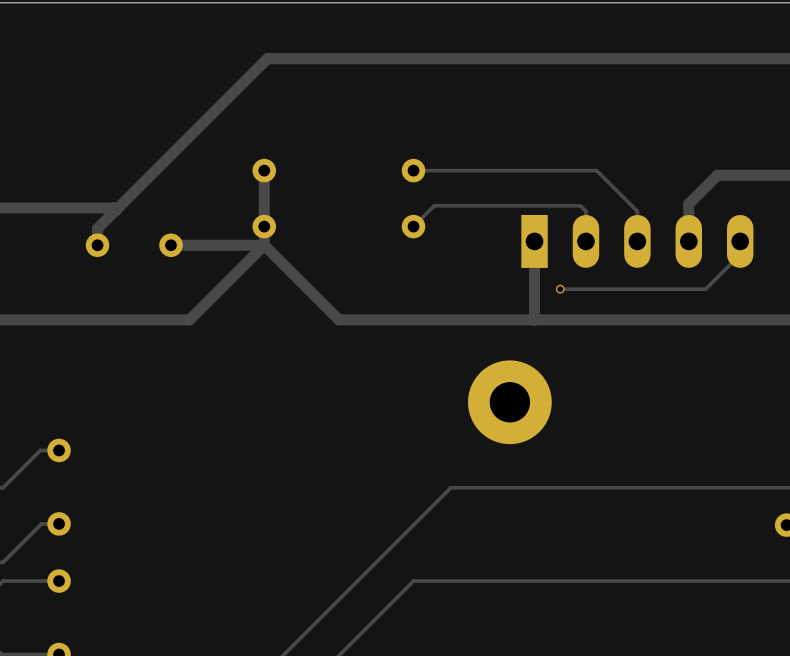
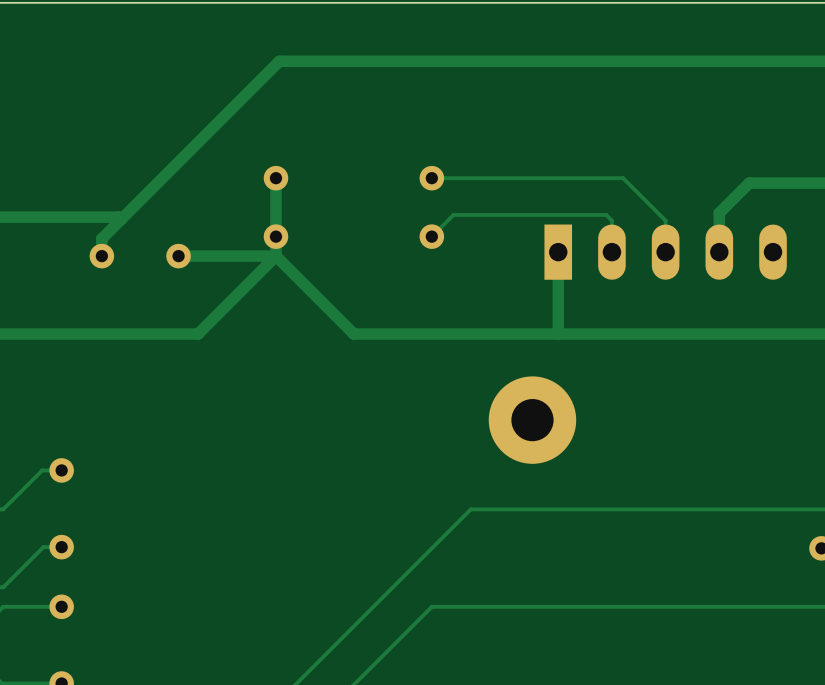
track: (740, 241) (740, 254) (705, 289) (560, 289) -> none
via: (560, 289) -> none

